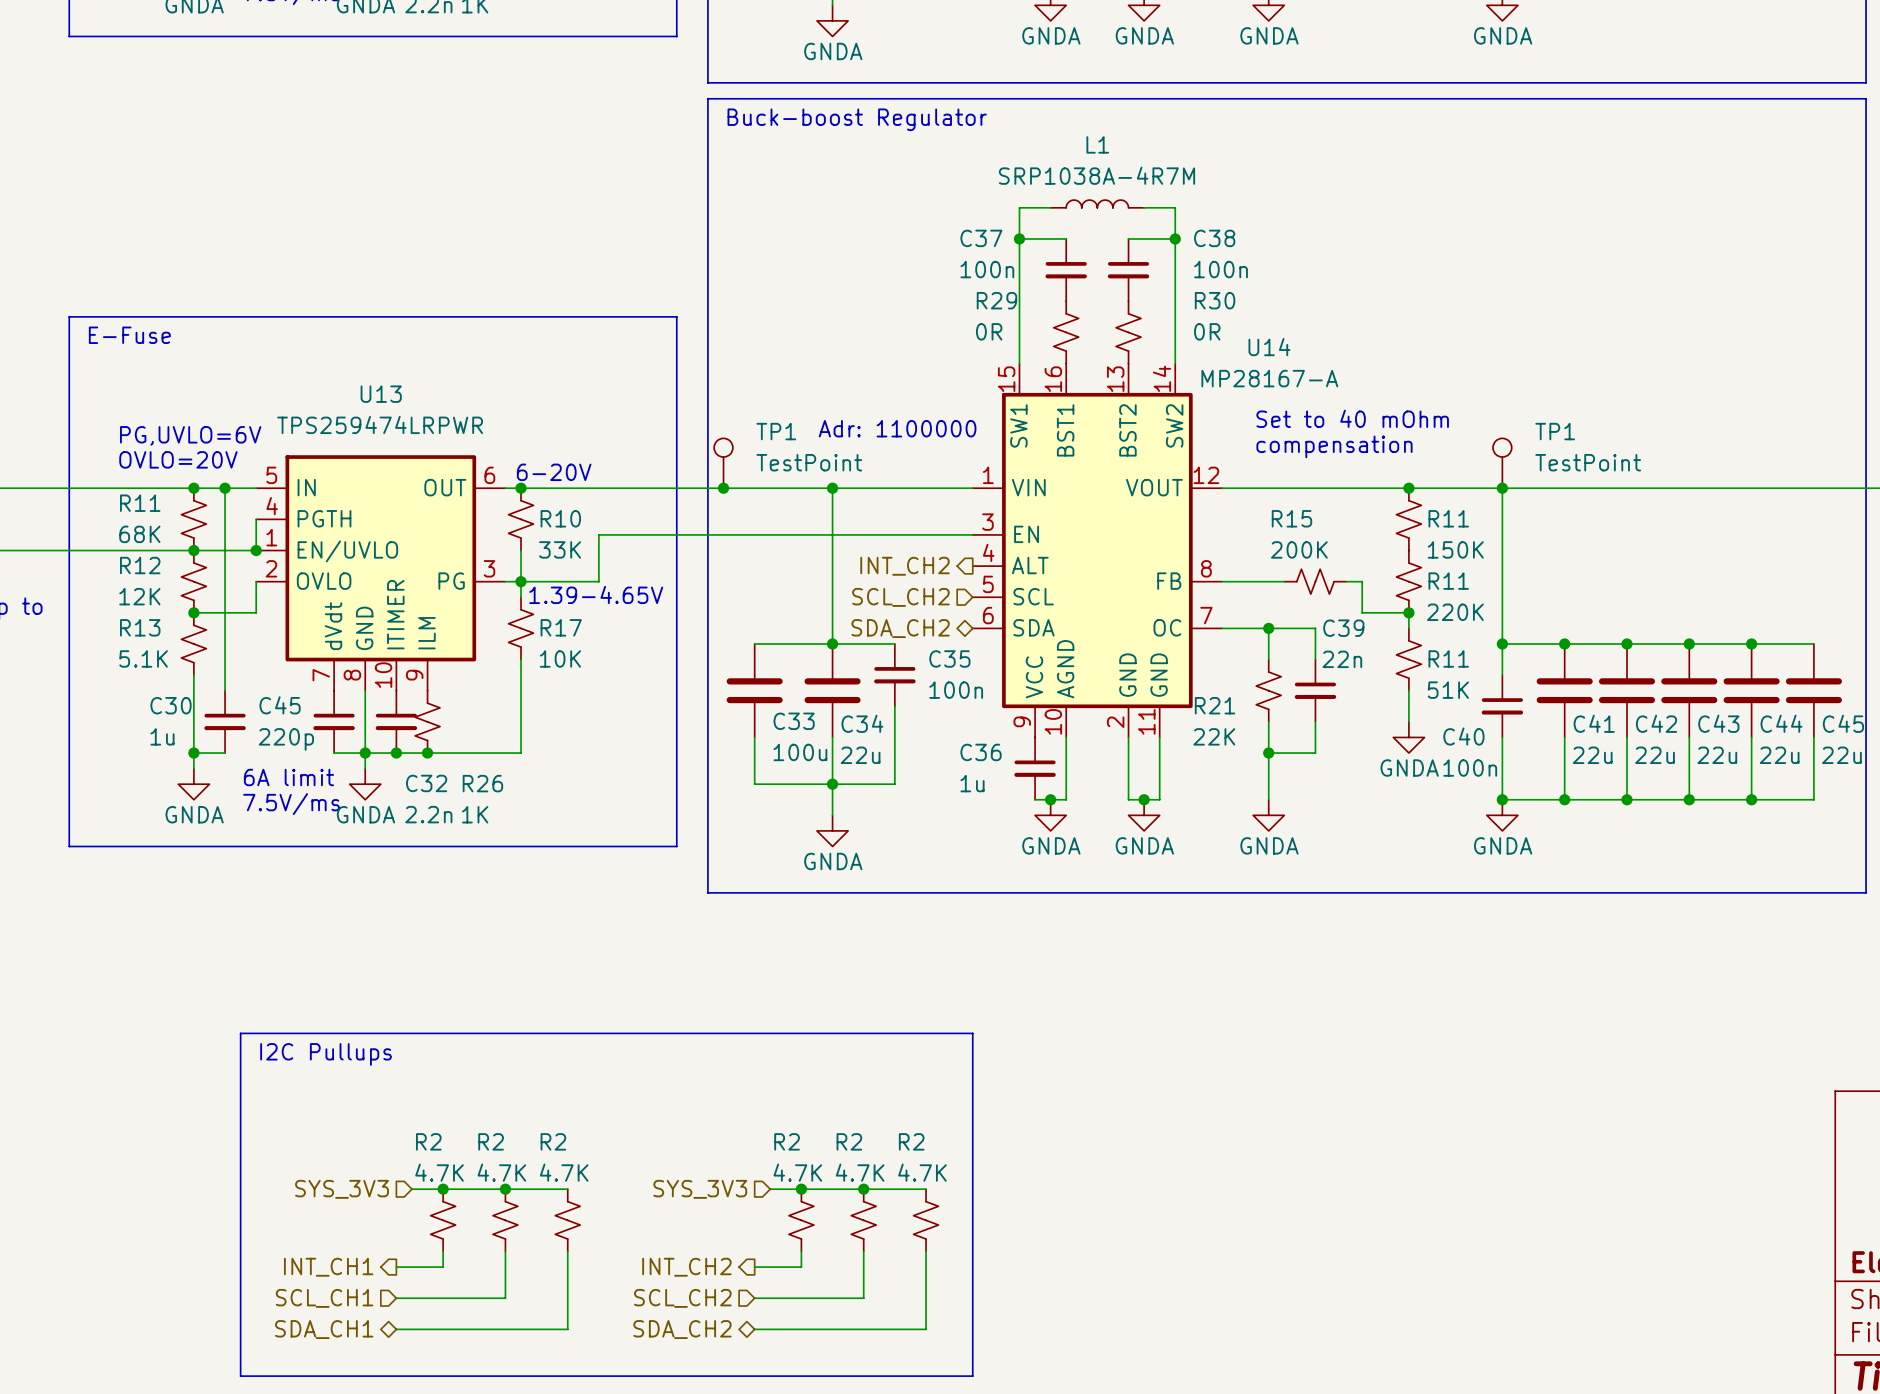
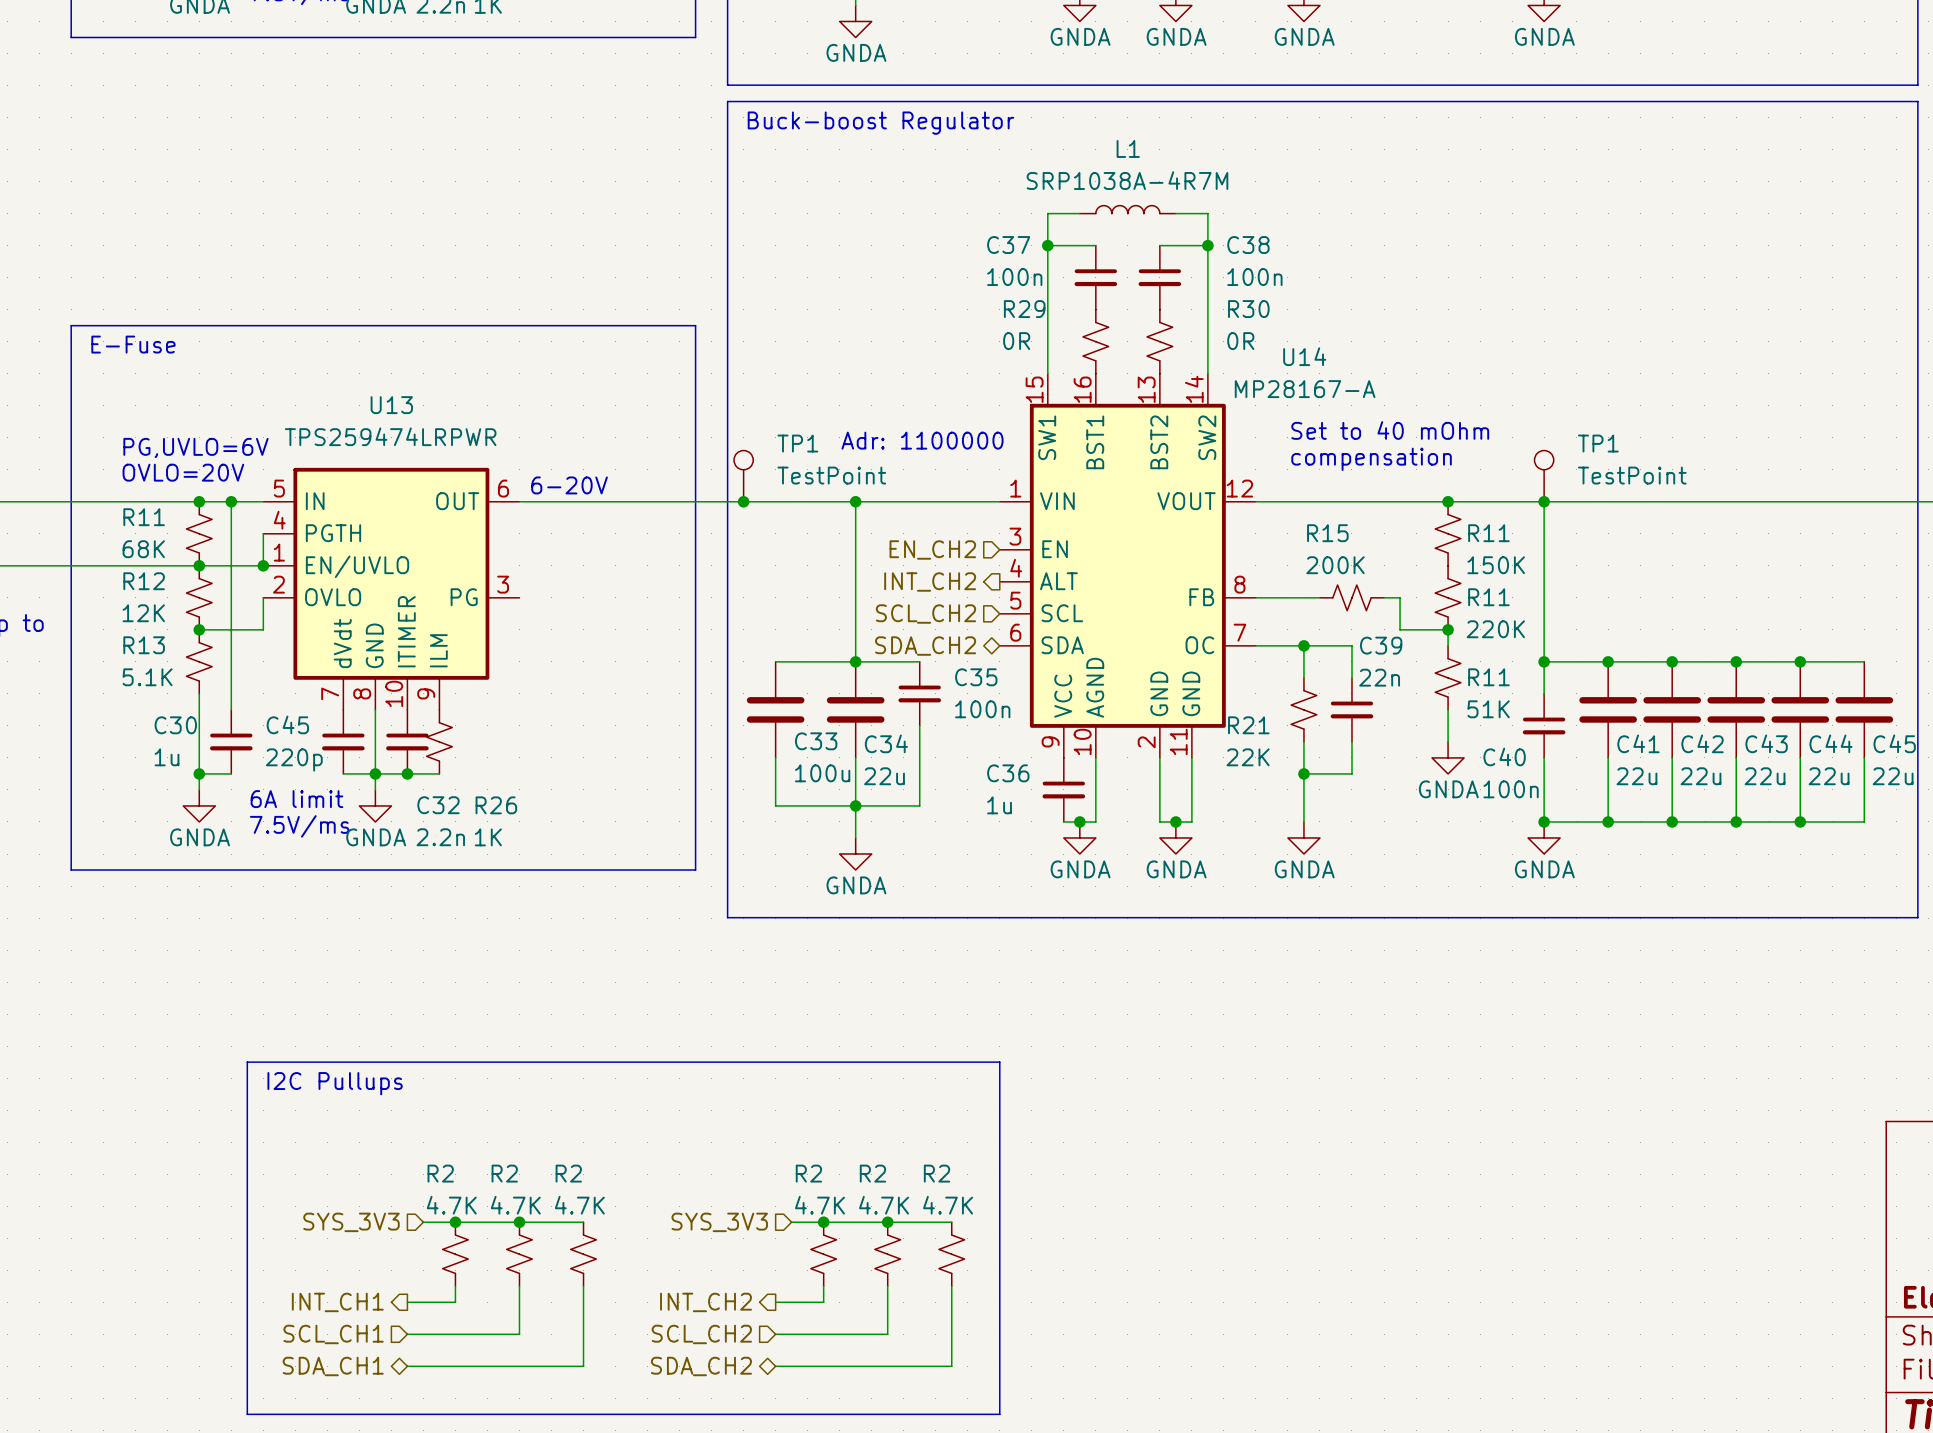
junction: (521, 488) -> none
R10: 33K (521, 519) -> none
wire: (972, 534) (598, 534) (598, 581) (505, 581) -> none
hierarchical label: none -> EN_CH2 (932, 549)
wire: (521, 550) (521, 597) -> none
junction: (521, 581) -> none
text: 1.39-4.65V (596, 594) -> none
R17: 10K (521, 628) -> none
wire: (521, 659) (521, 753) (427, 753) -> none
junction: (427, 753) -> none

